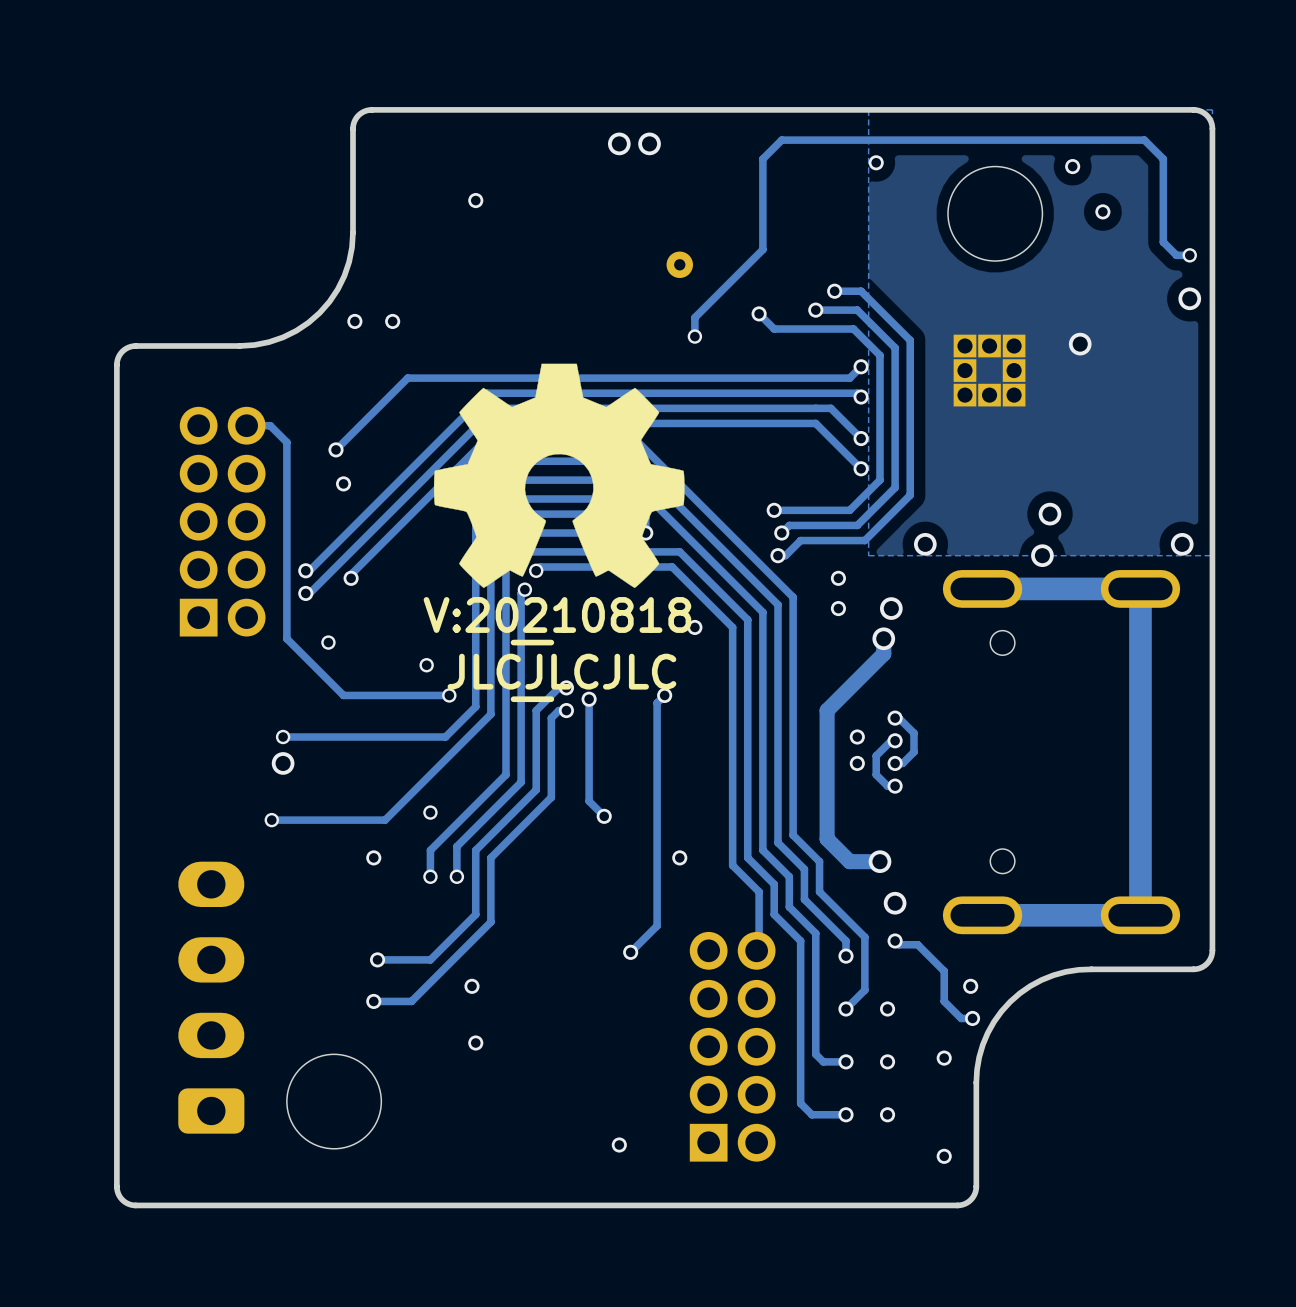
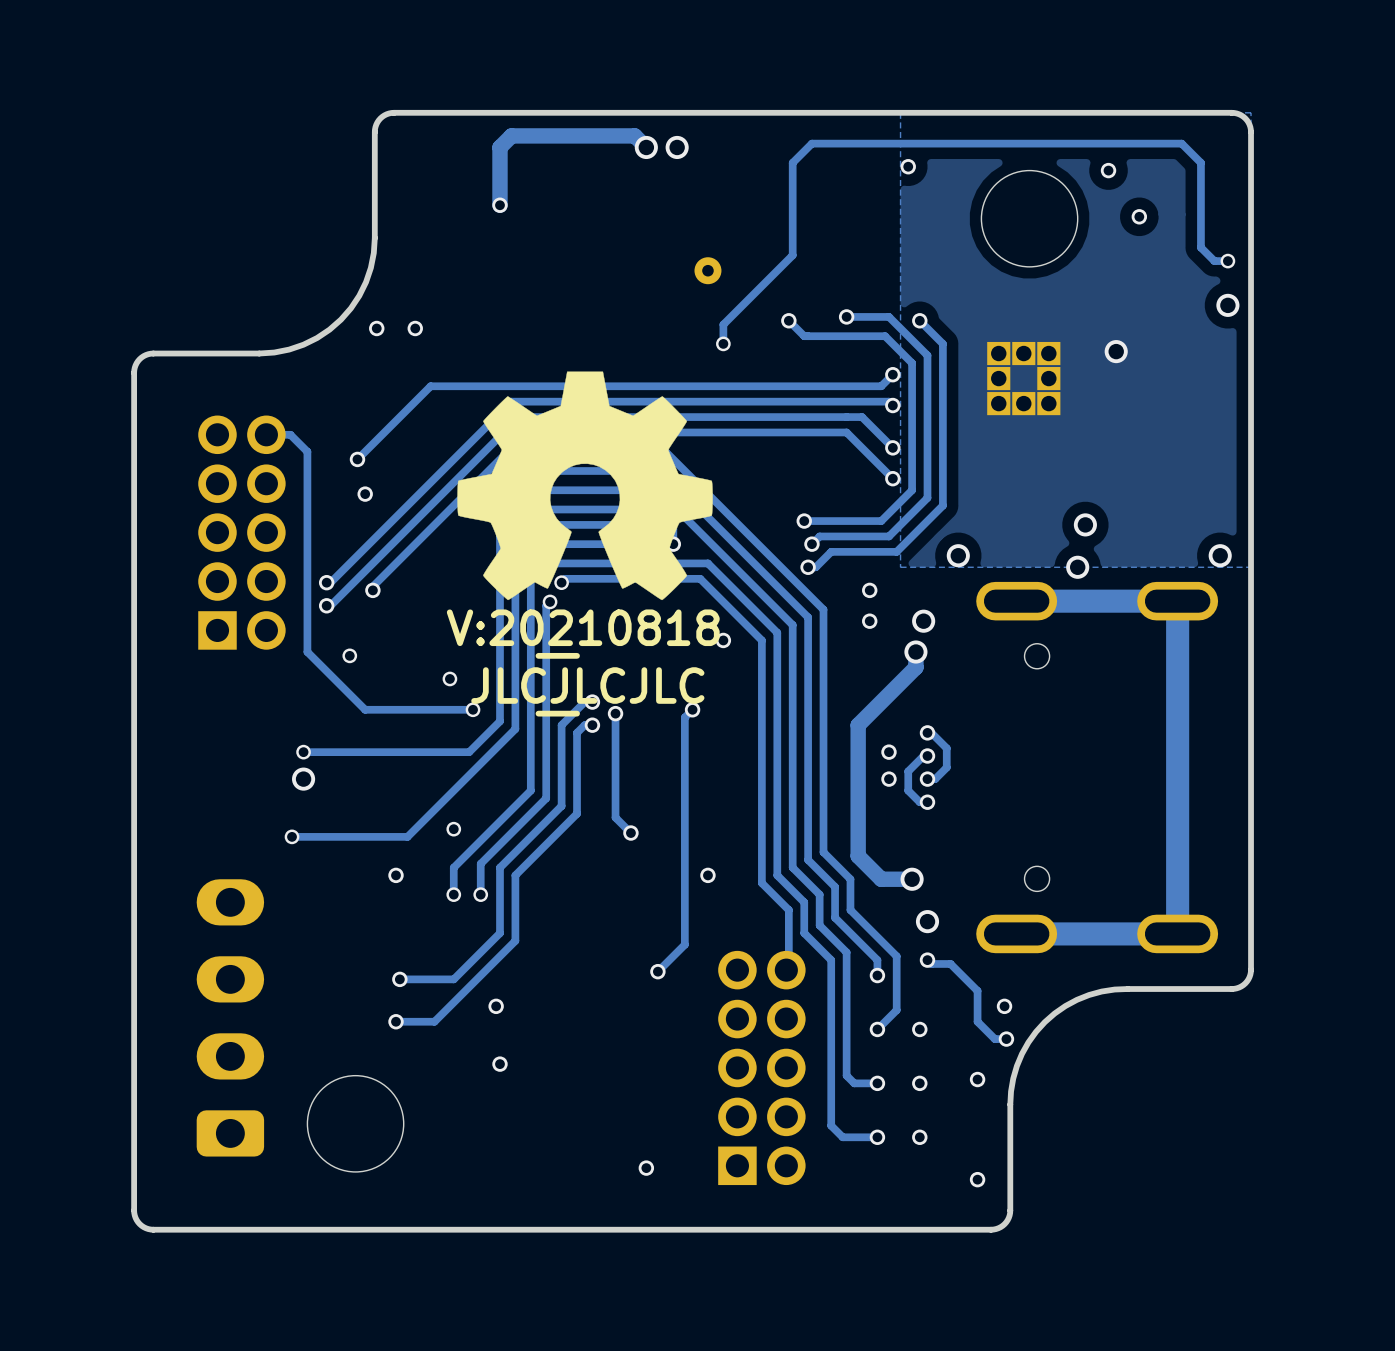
track: none -> (646, 147) (634, 135) (511, 135) (499, 147) (499, 205)
track: (834, 291) (861, 291) (910, 340) -> (919, 320) (942, 343) (942, 347)
via position: (834, 291) -> (919, 320)

